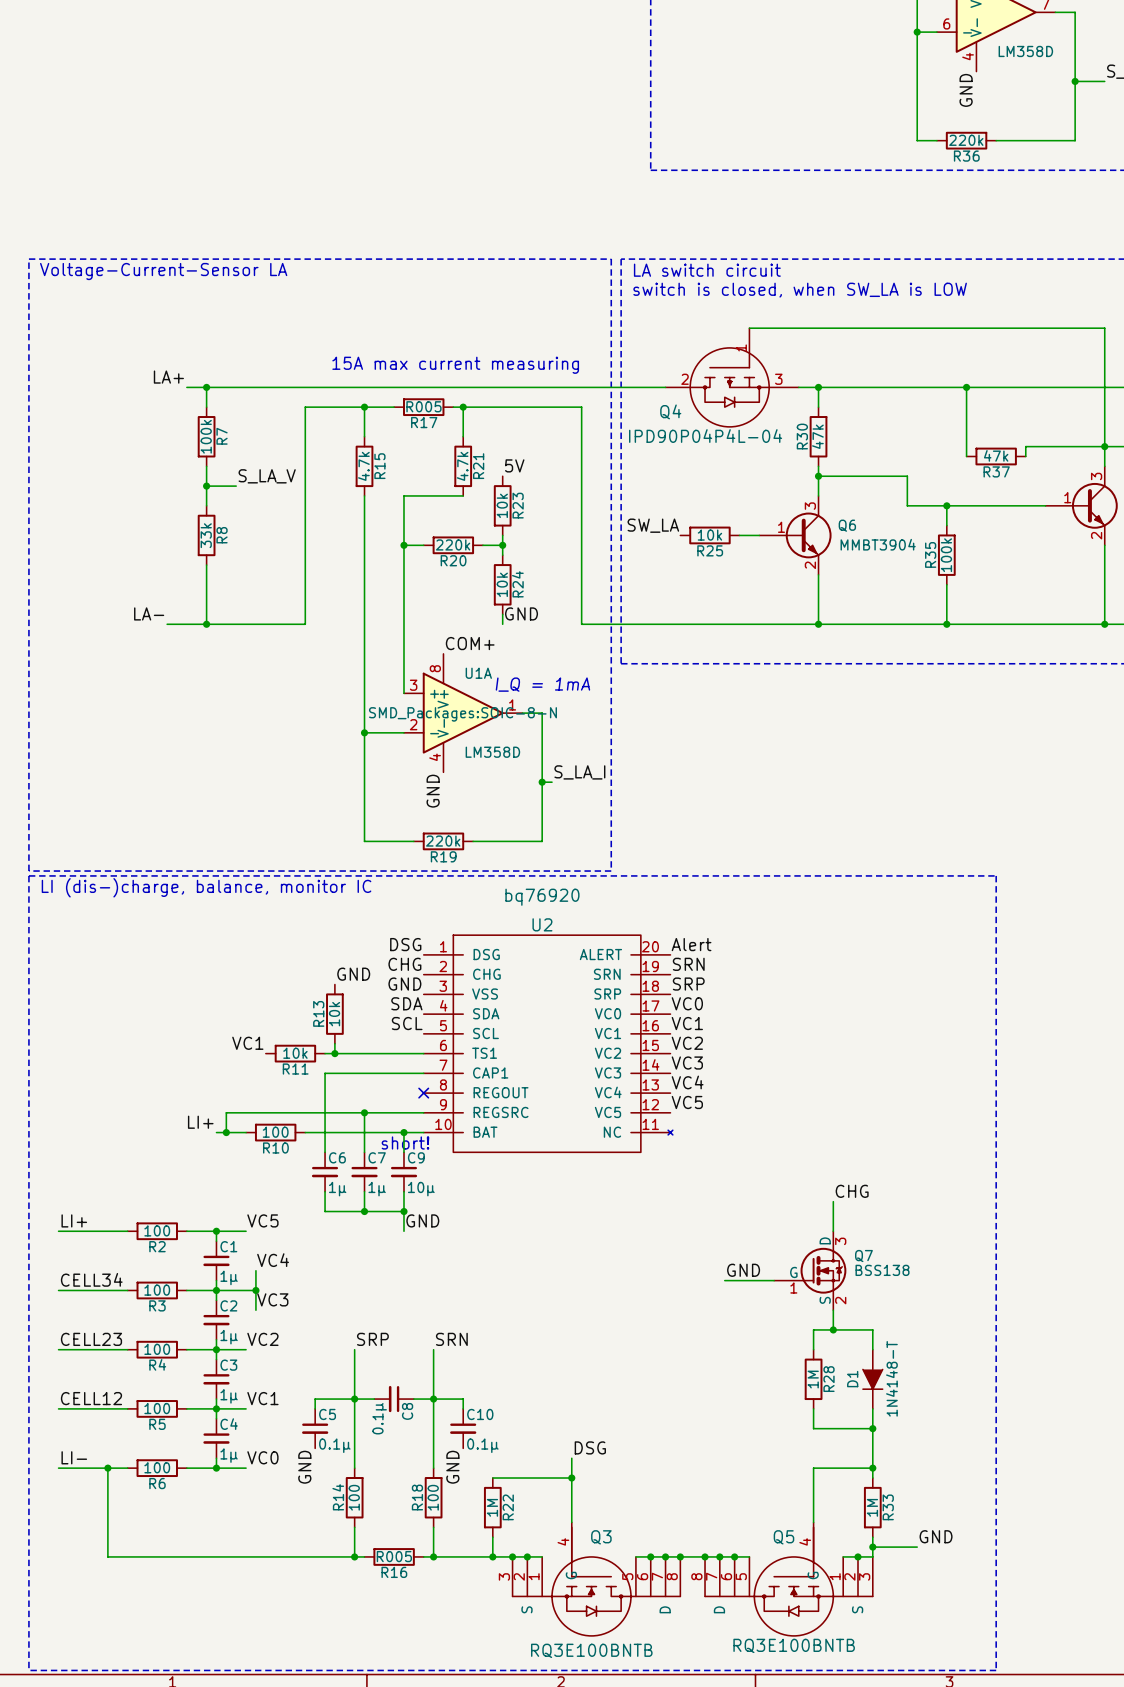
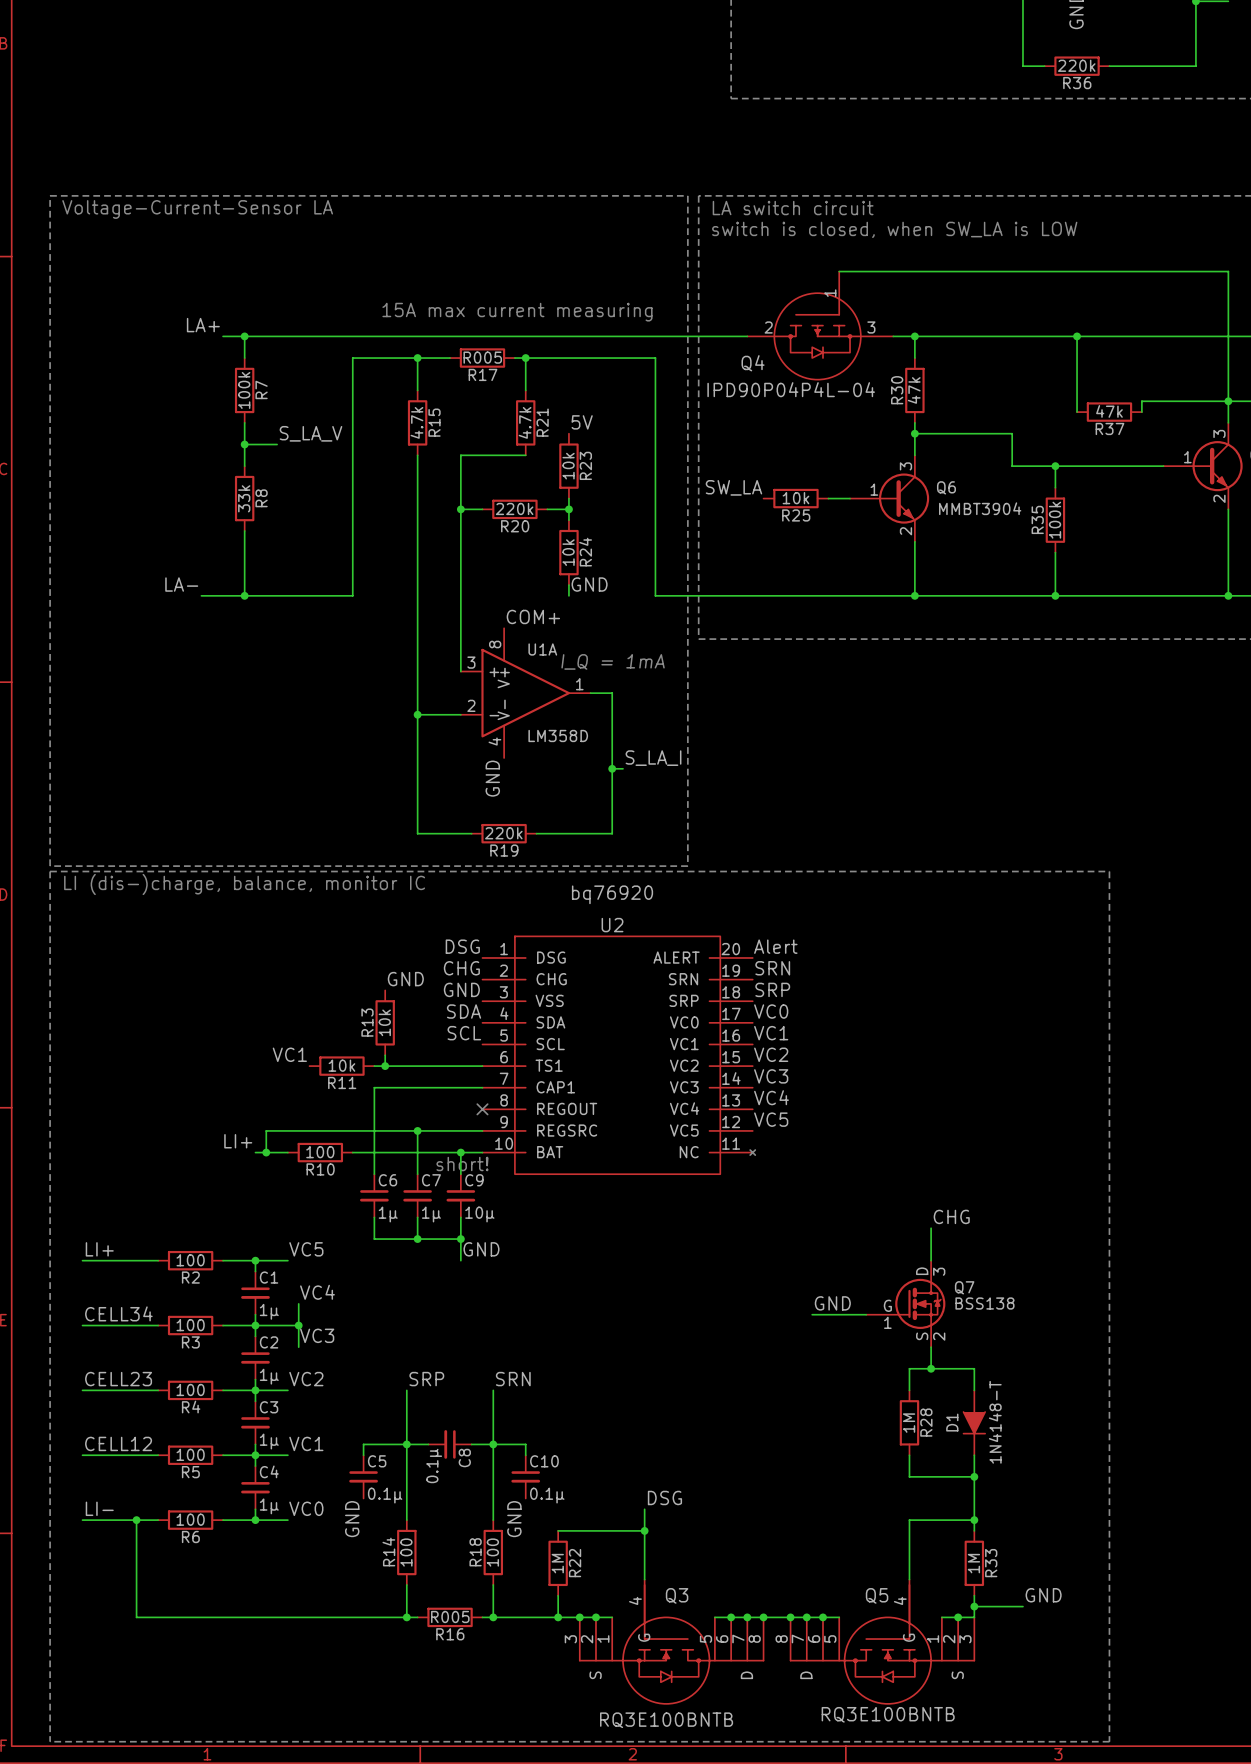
U1A text: SMD_Packages:SOIC-8-N (462, 714) -> none

